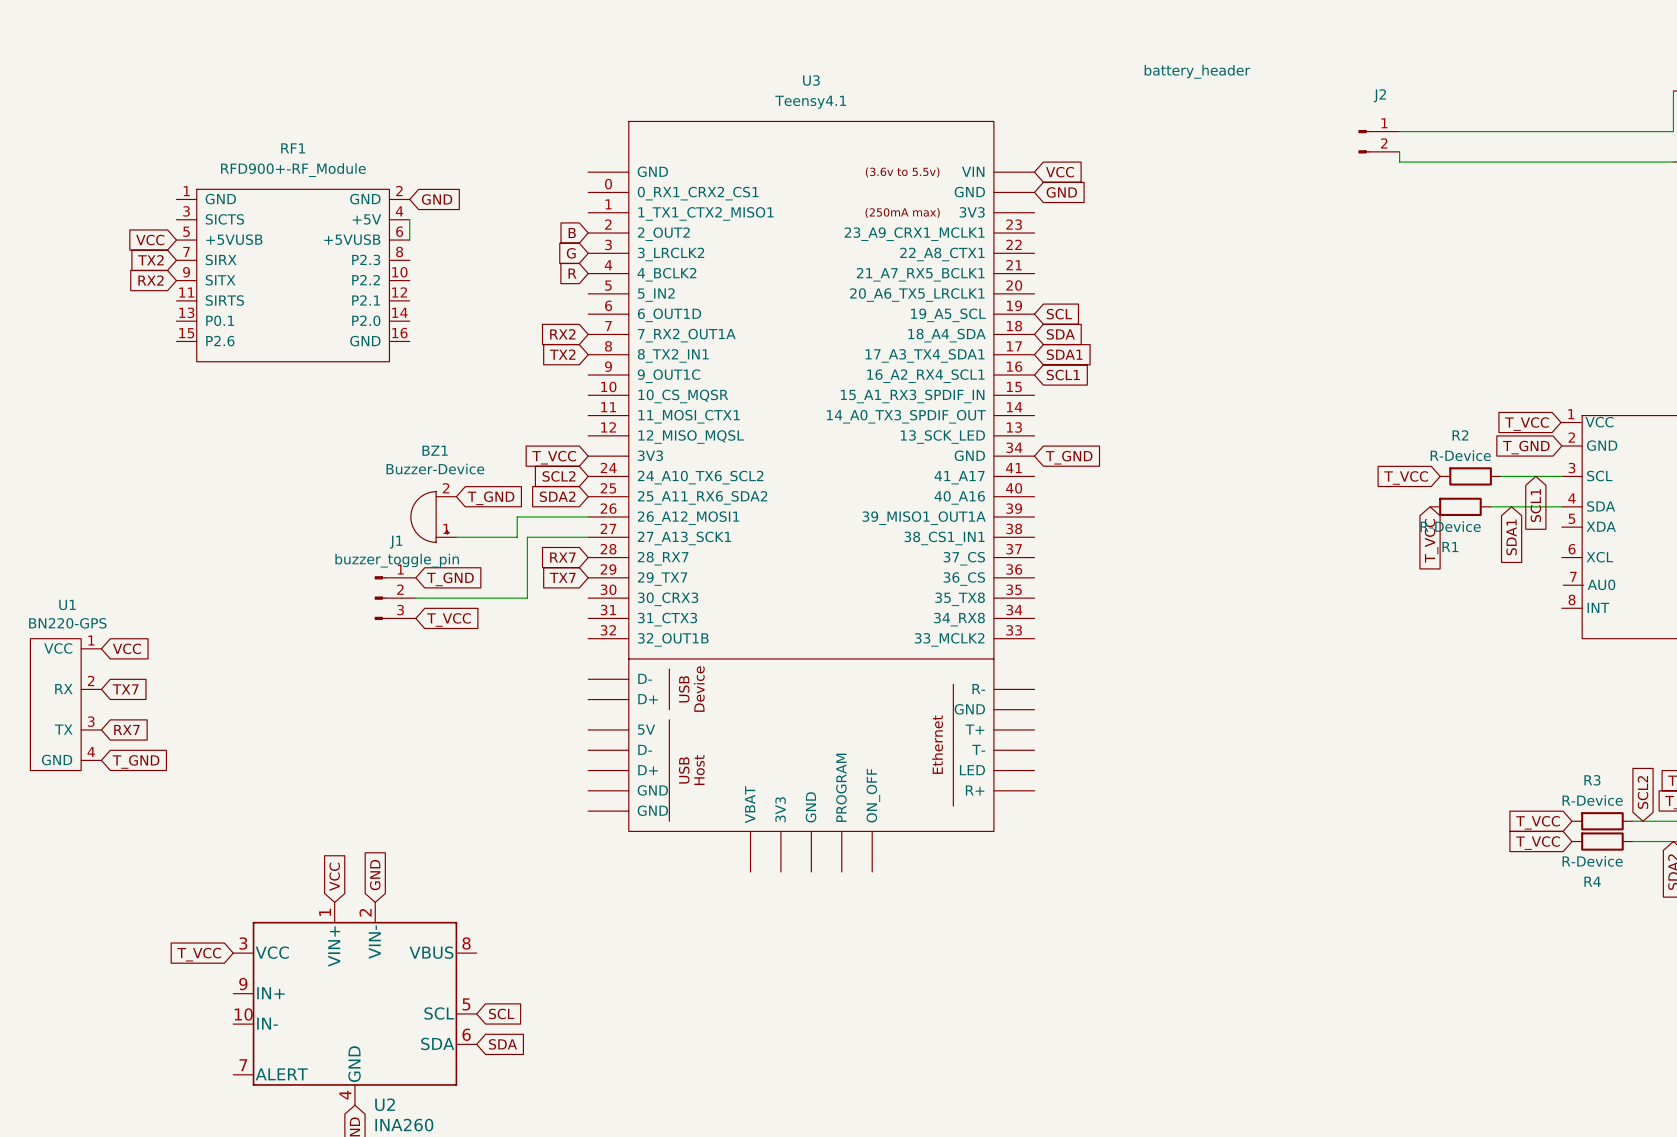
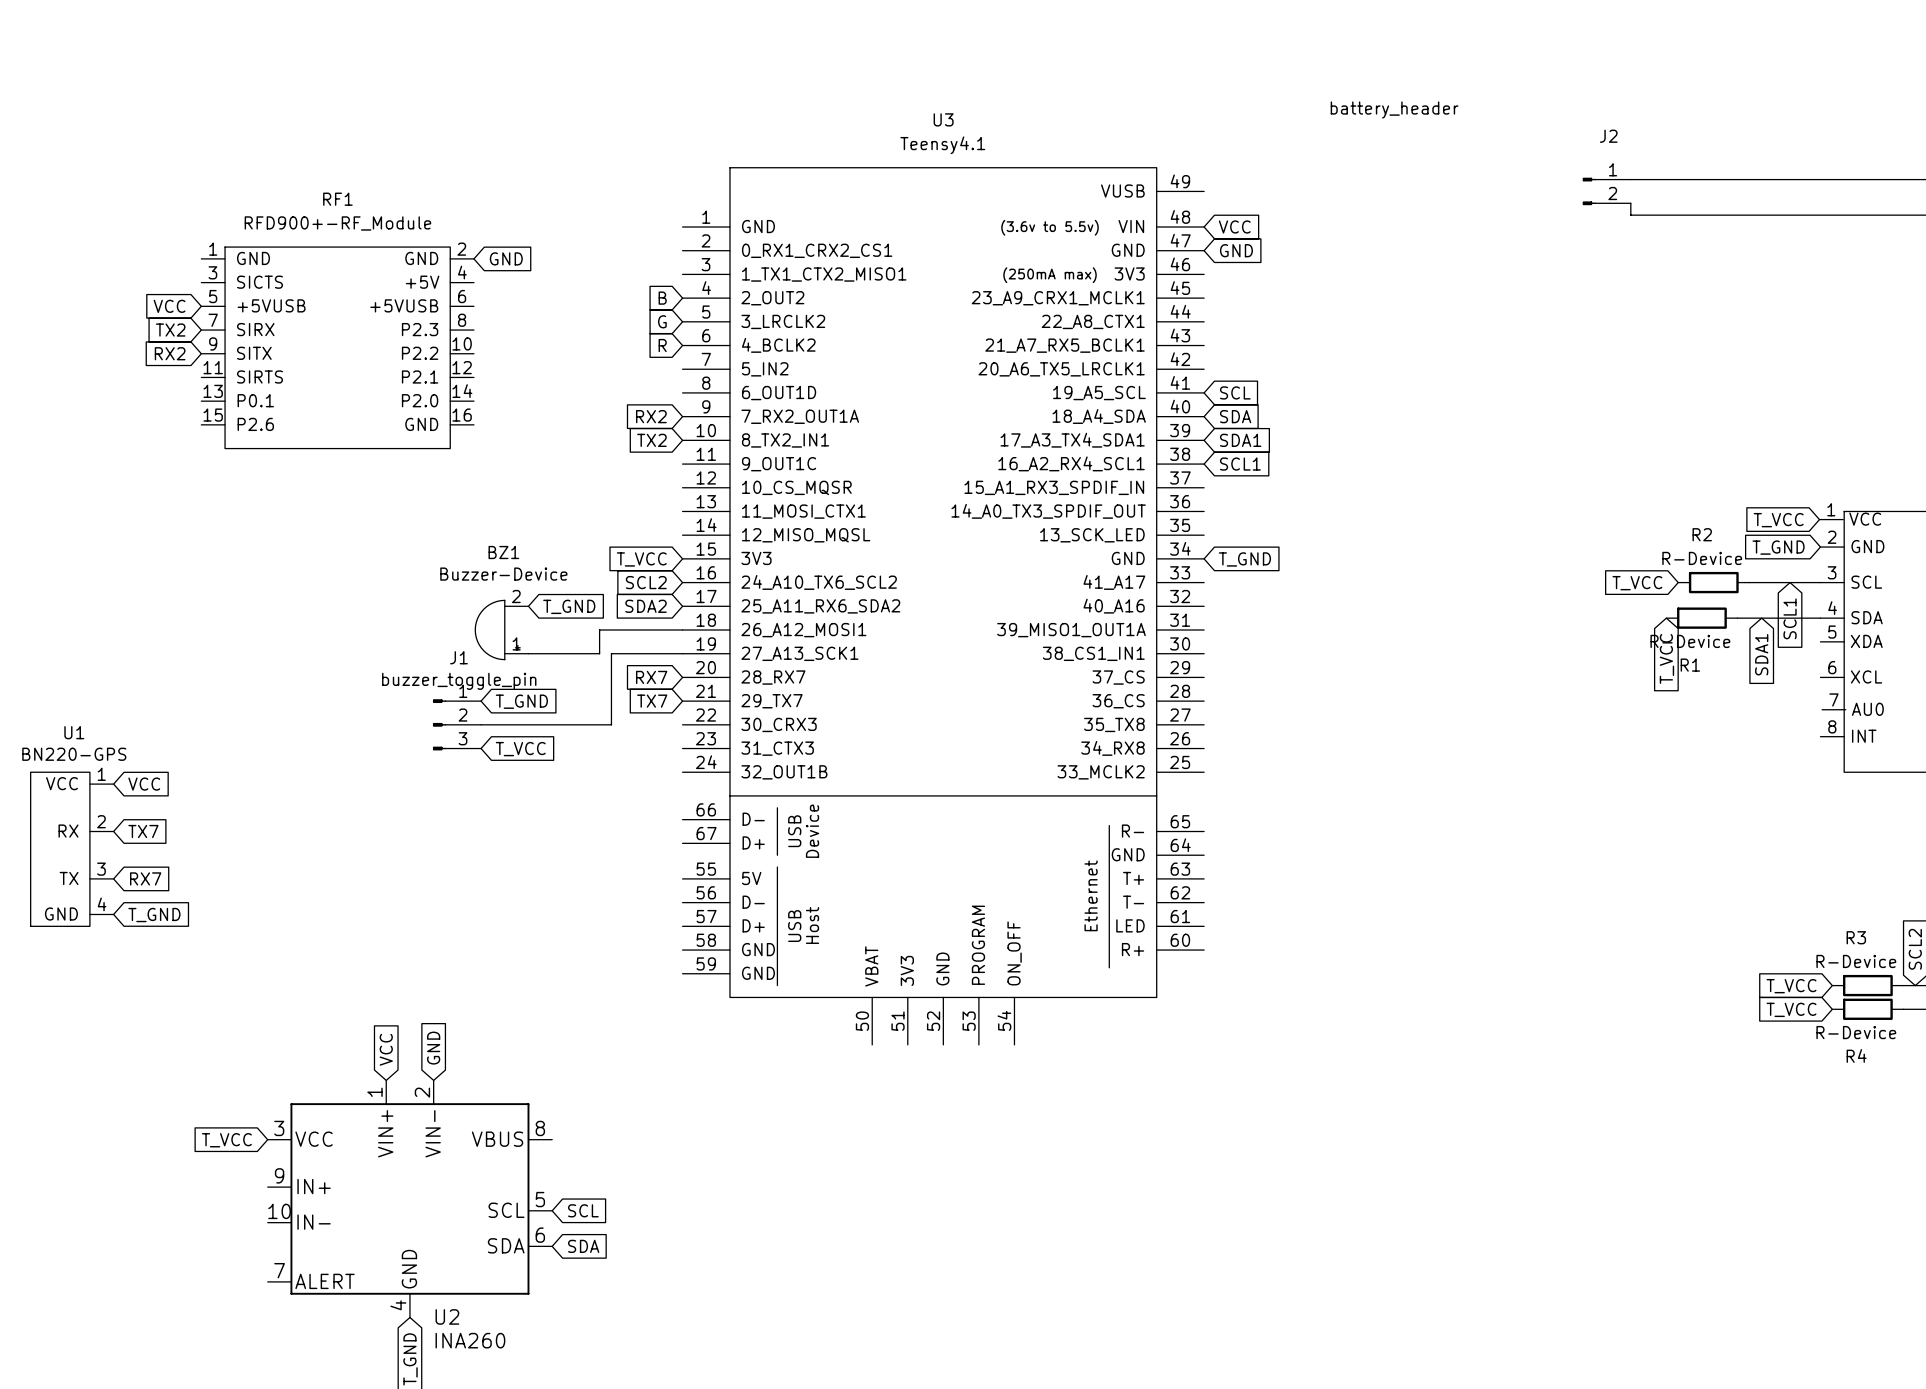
U3 symbol: [588, 121, 1035, 872] -> [682, 167, 1205, 1045]
RF1 symbol: [176, 189, 410, 362] -> [201, 247, 474, 449]
wire: (409, 219) (409, 240) -> none

